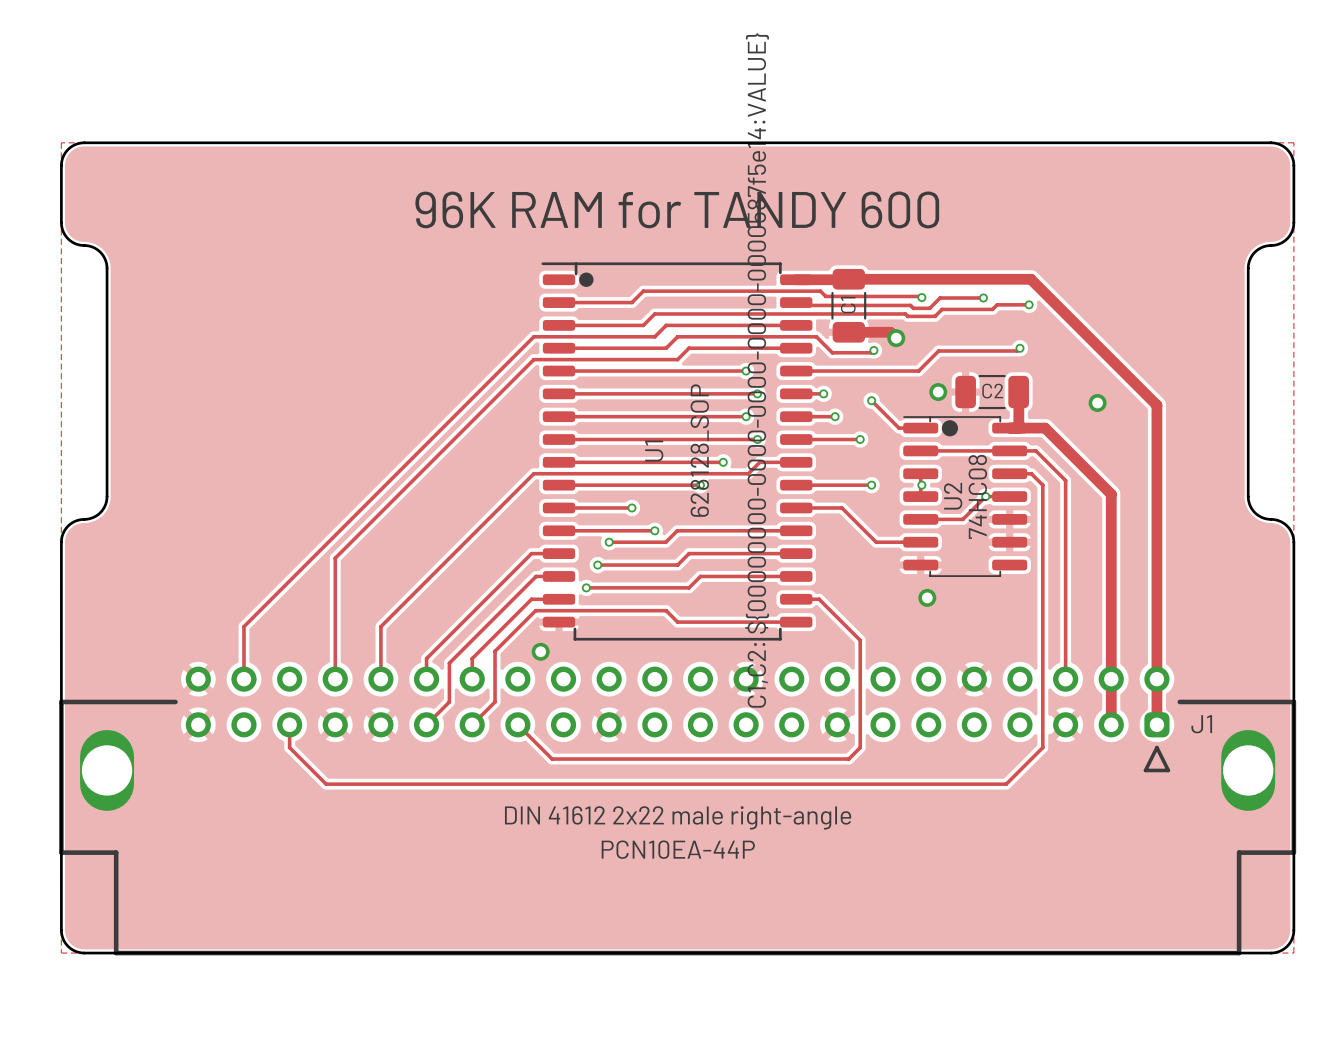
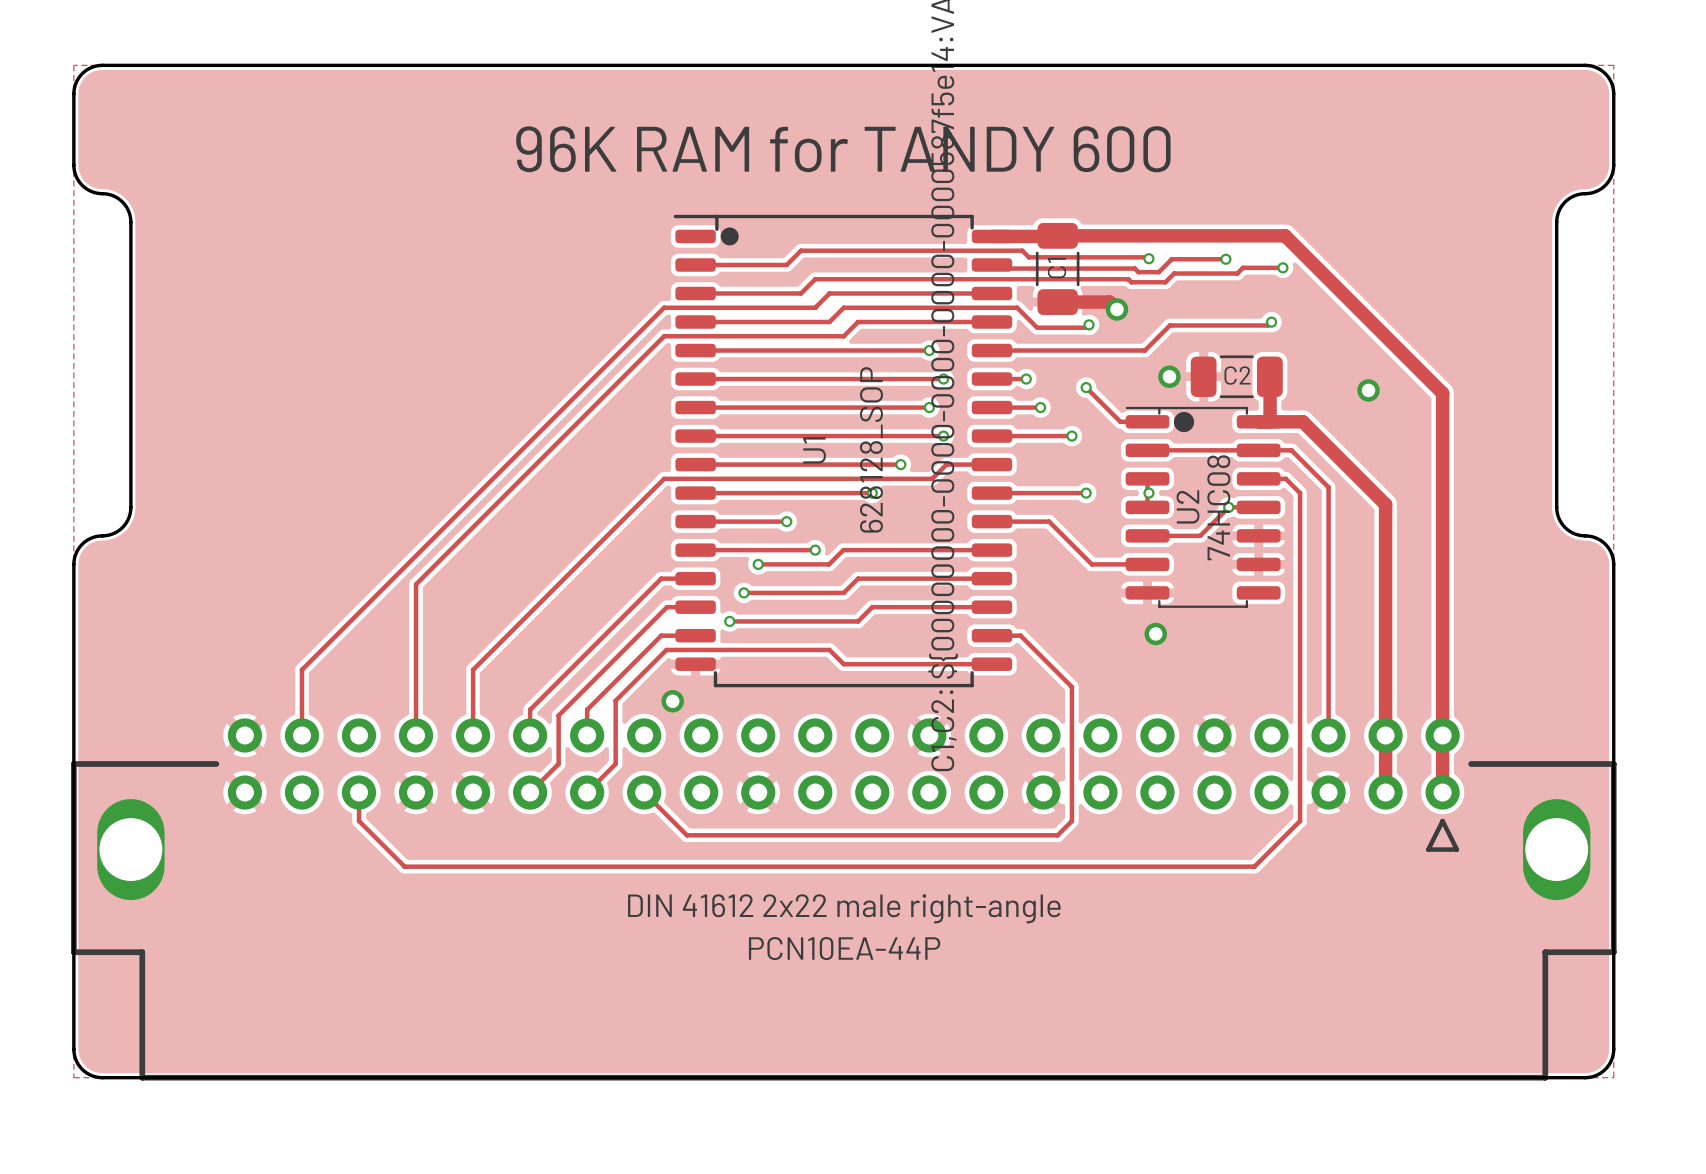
J1: DIN 41612 2x22 male right-angle (677, 810) -> none
part: none -> DIN 41612 2x22 male right-angle (843, 899)

